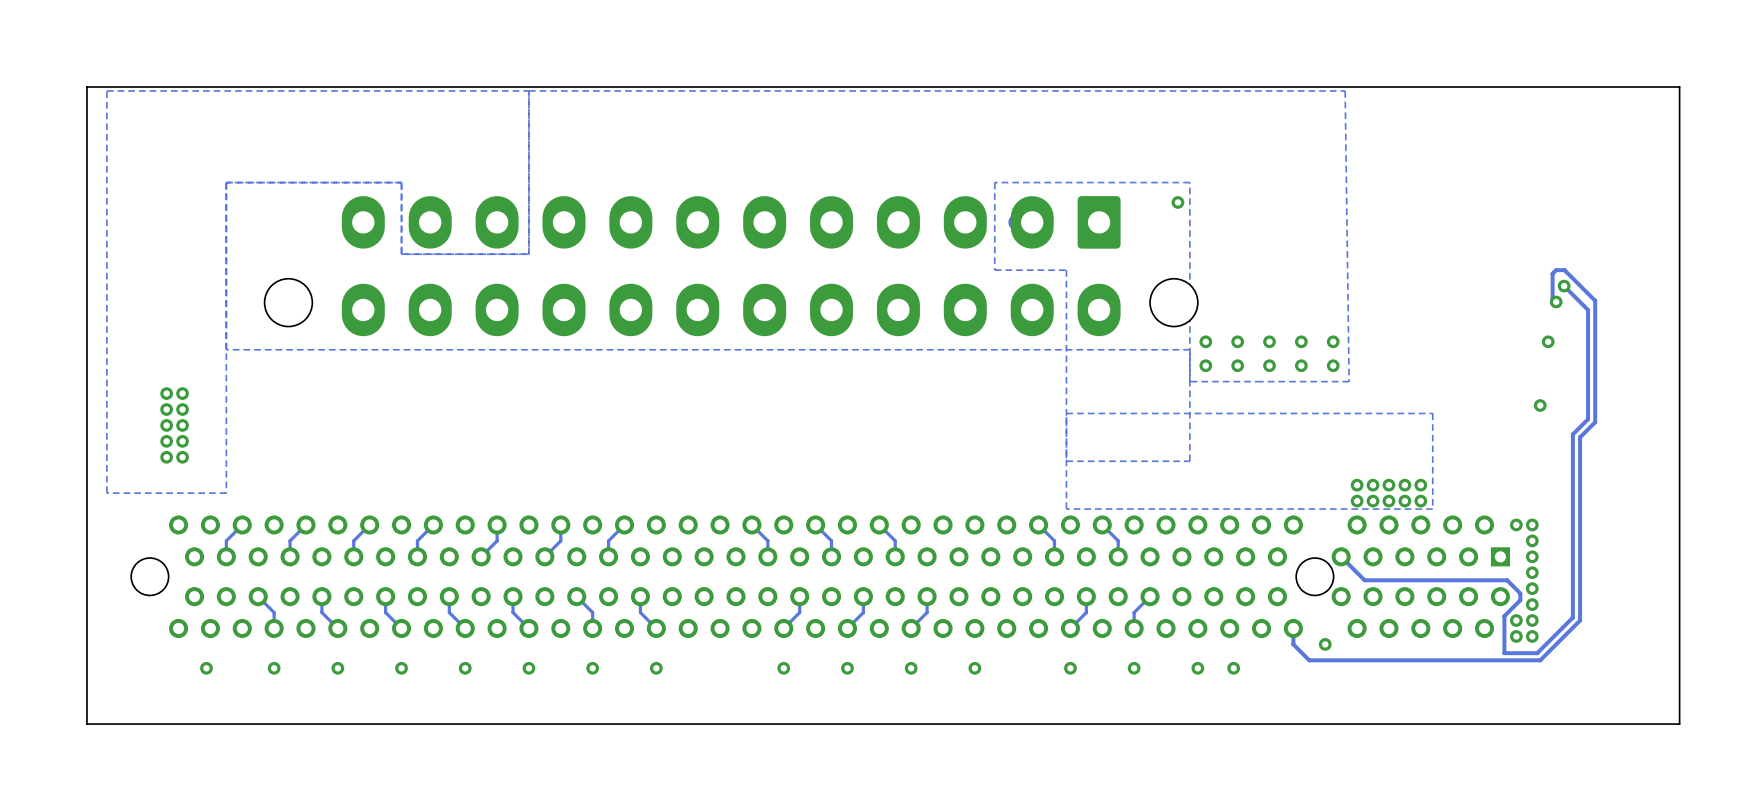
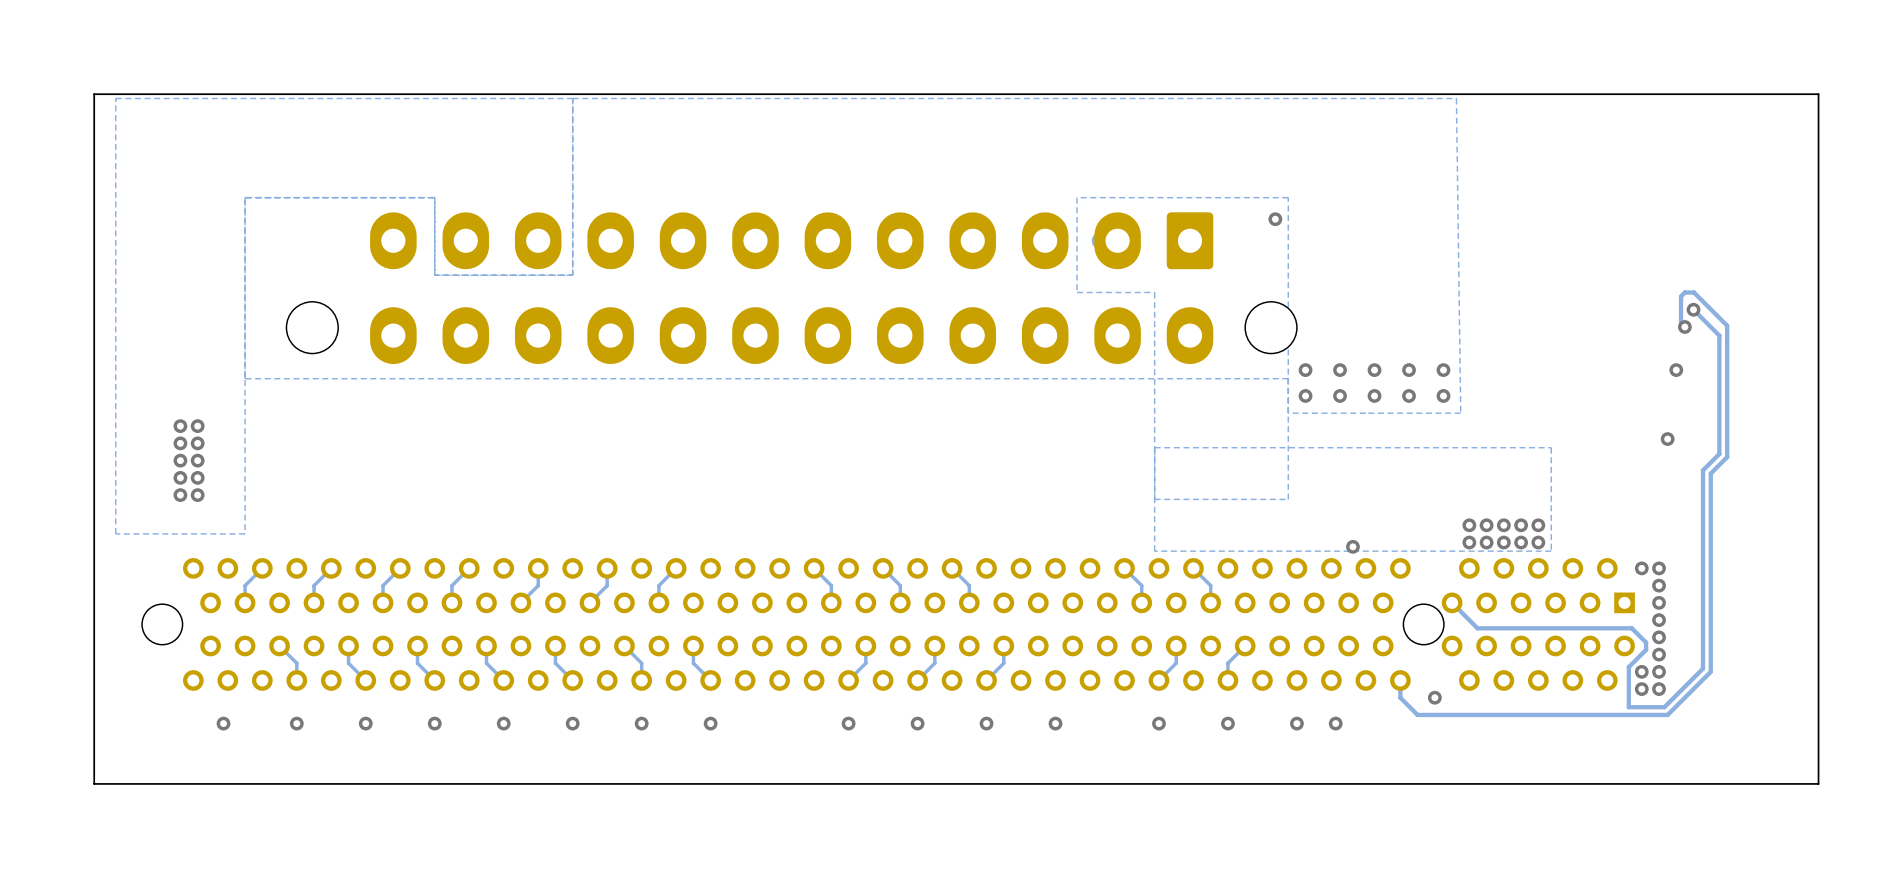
via: none -> (1352, 546)

